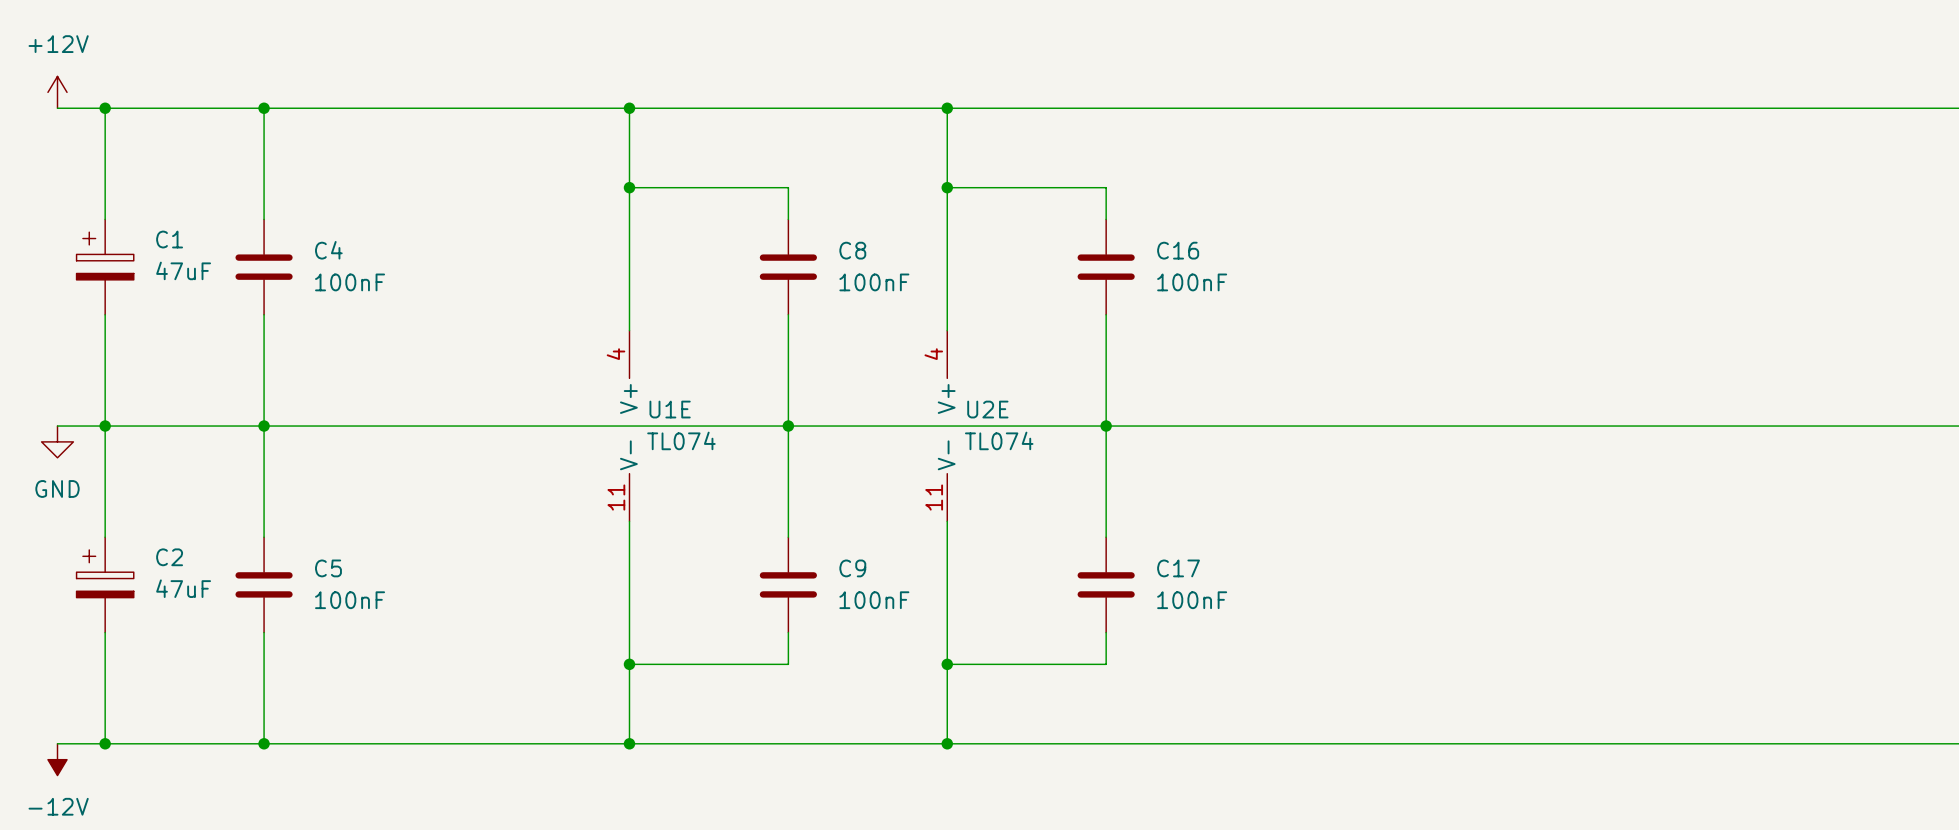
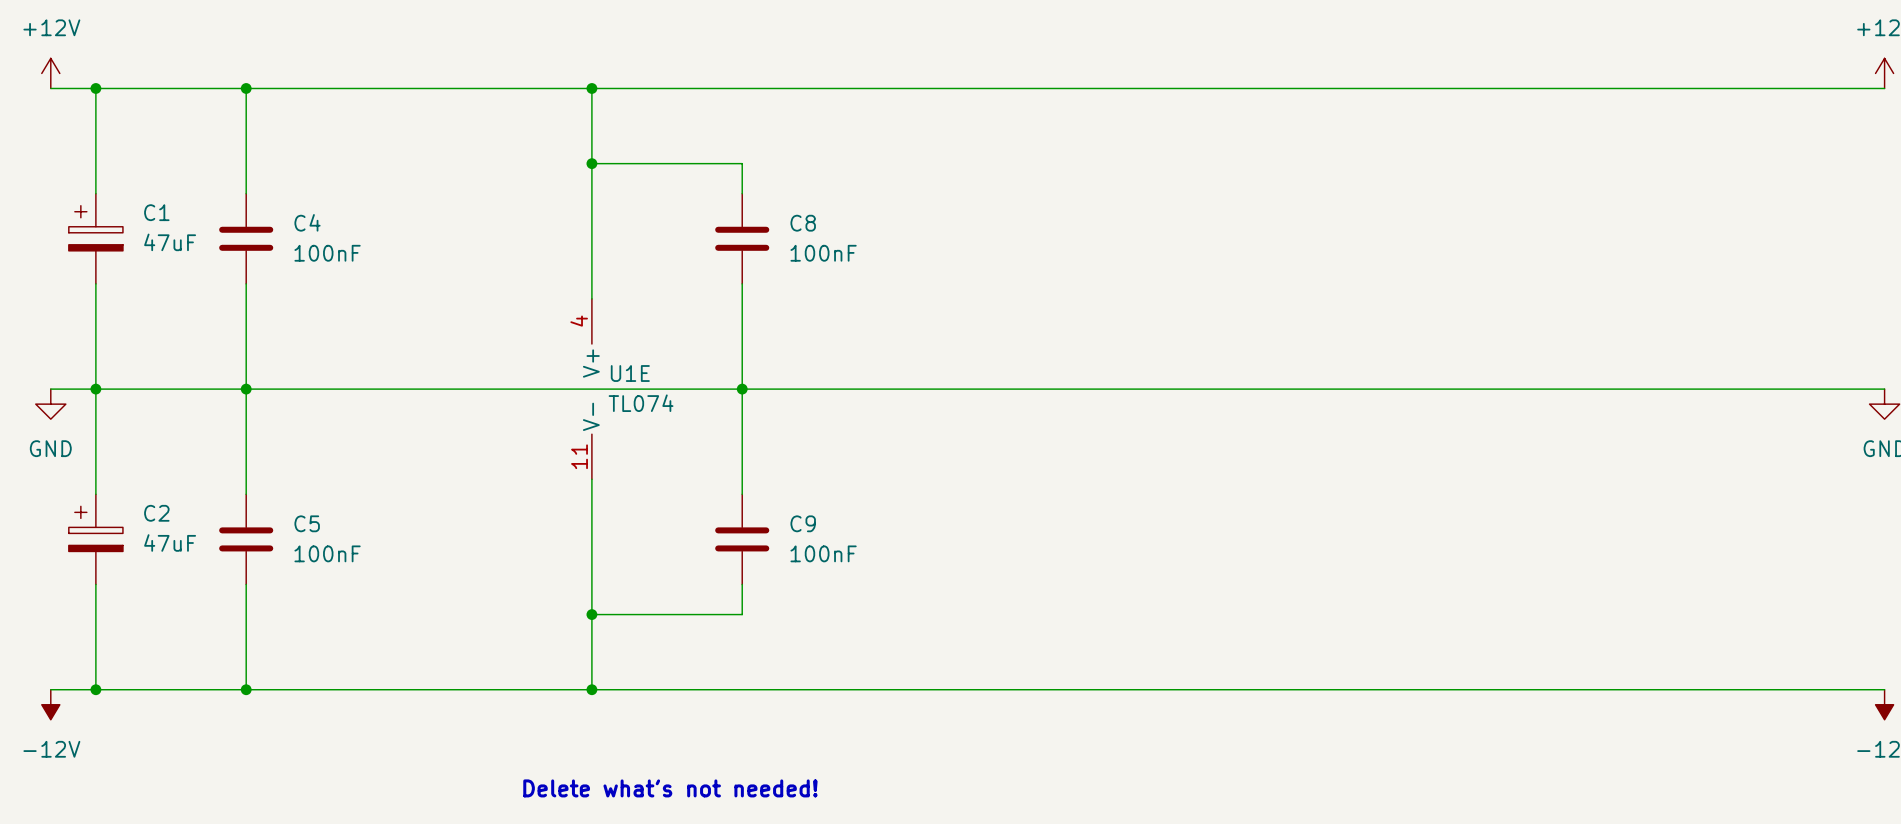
wire: (947, 108) (947, 330) -> none
junction: (947, 108) -> none
wire: (947, 187) (1106, 187) (1106, 219) -> none
junction: (947, 187) -> none
C16: 100nF (1106, 267) -> none
wire: (1106, 314) (1106, 537) -> none
U2E: TL074 (947, 426) -> none
junction: (1106, 426) -> none
wire: (947, 521) (947, 743) -> none
C17: 100nF (1106, 584) -> none
wire: (1106, 632) (1106, 664) (947, 664) -> none
junction: (947, 664) -> none
junction: (947, 743) -> none

